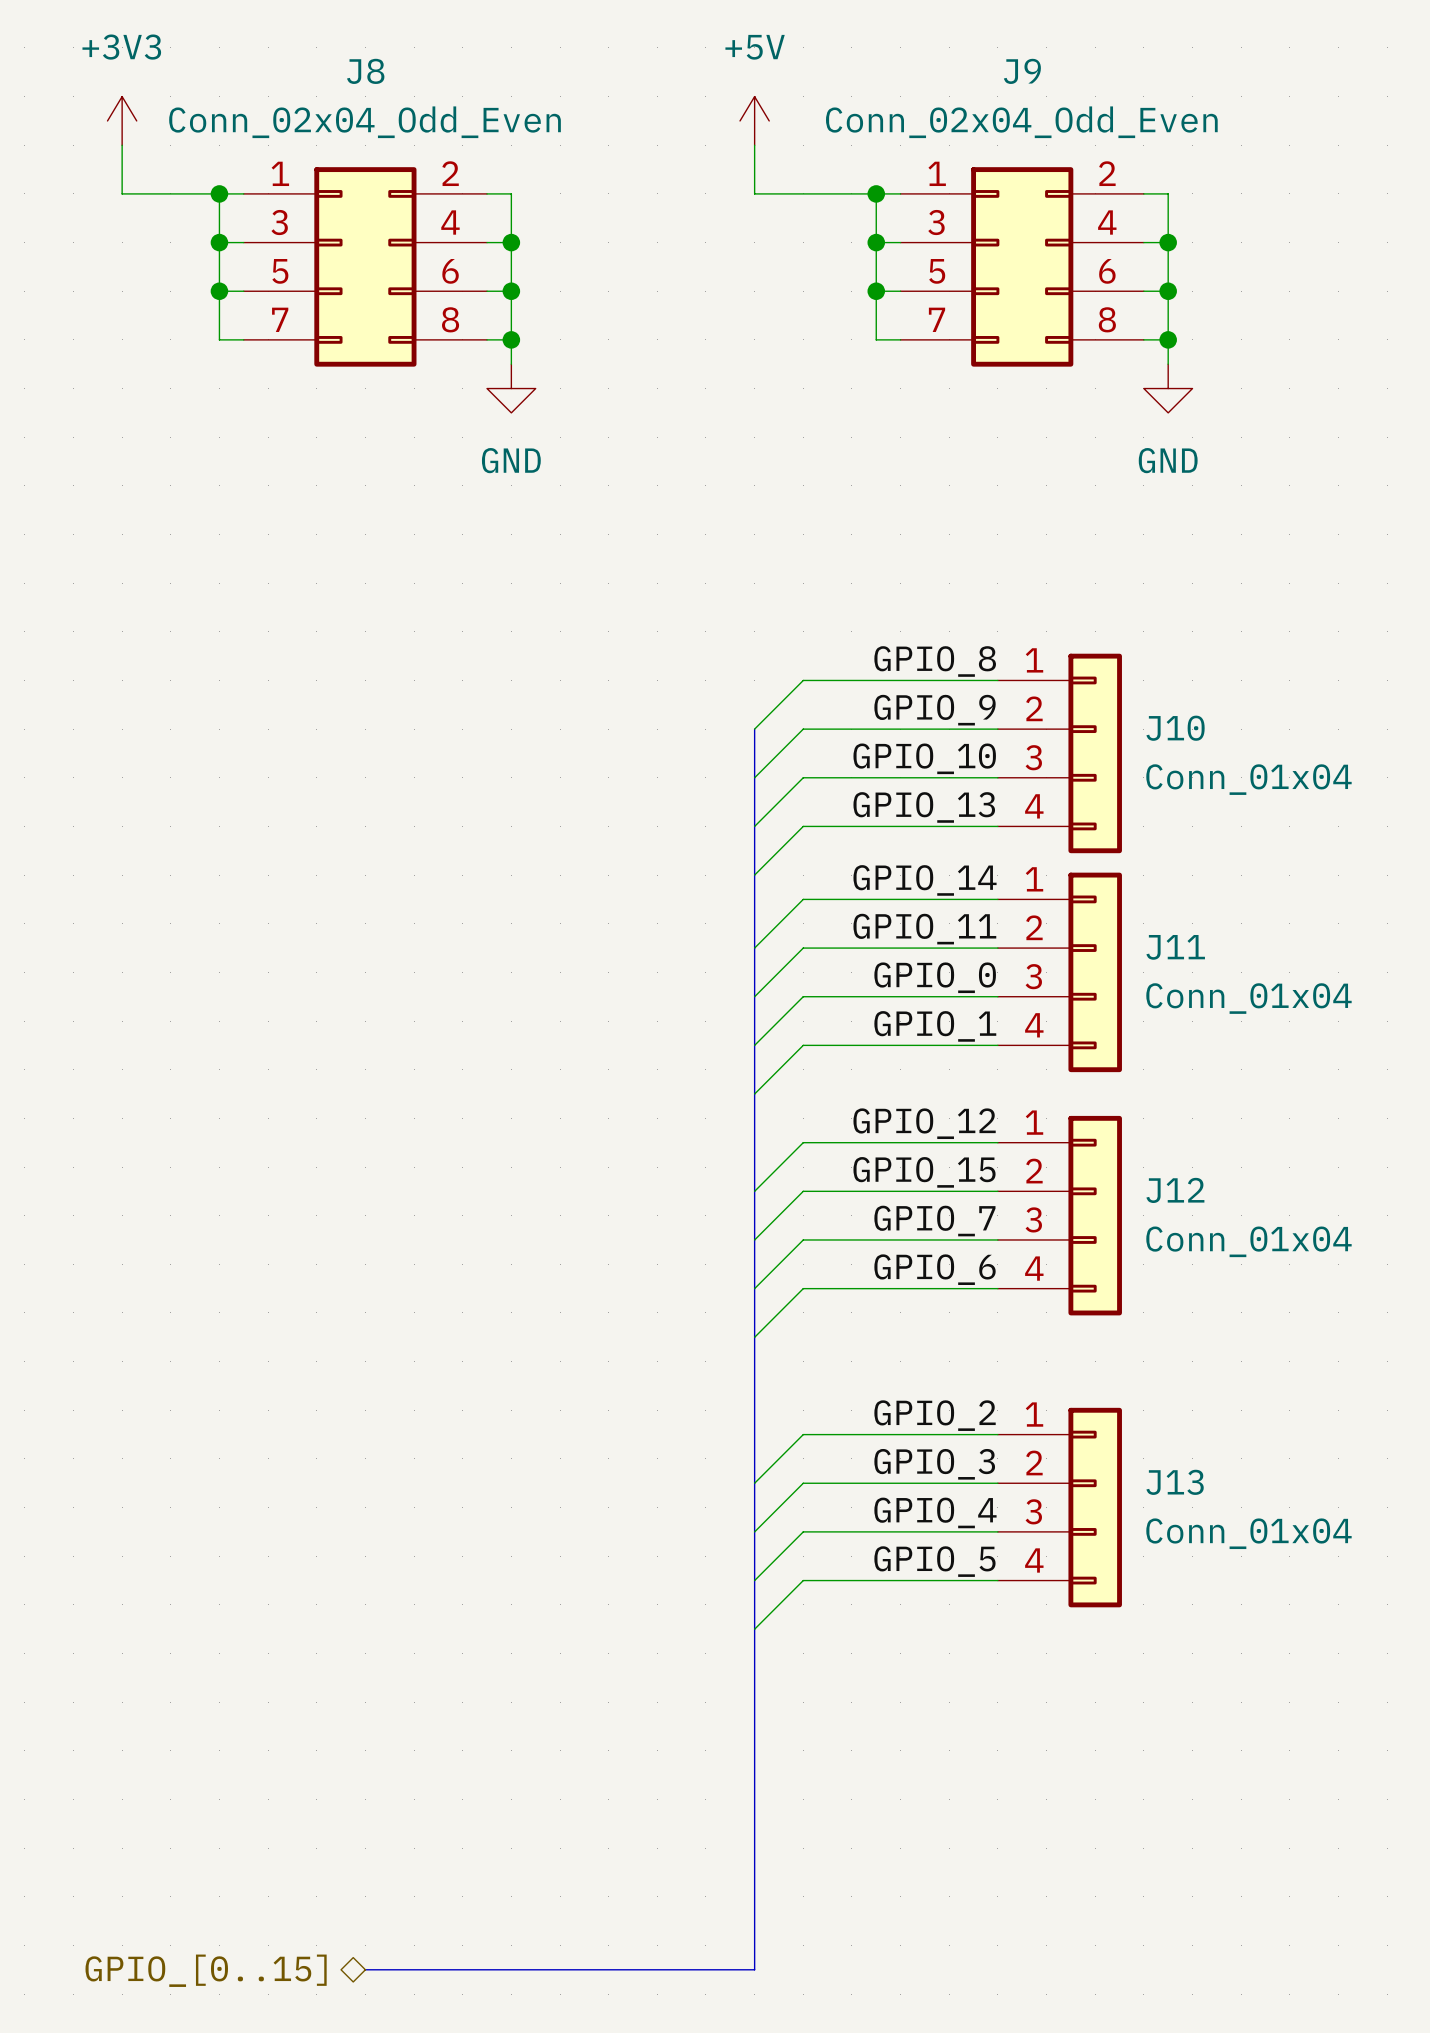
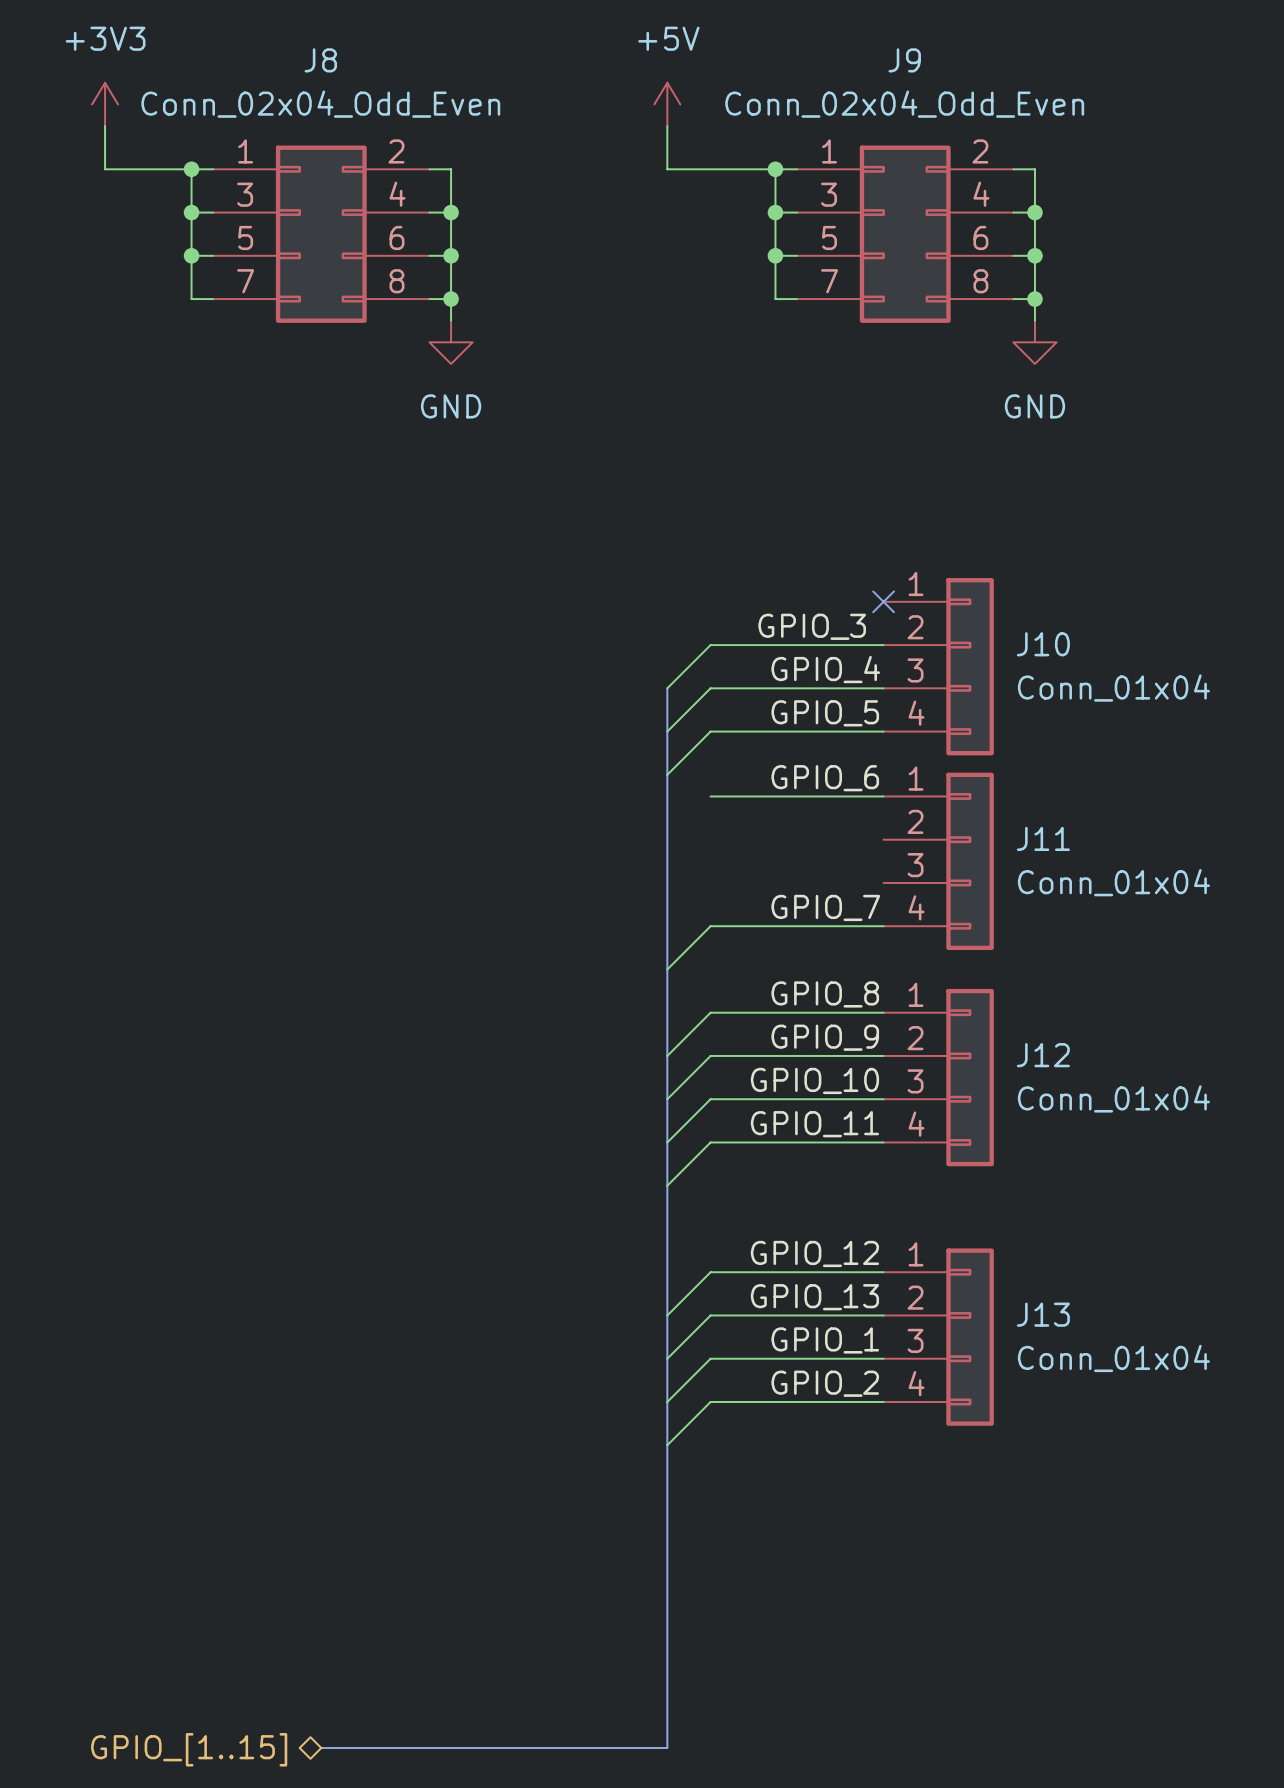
label: GPIO_8 (935, 661) -> none
wire: (997, 680) (803, 680) (754, 729) -> none
no-connect mark: none -> (883, 601)
label: none -> GPIO_3 (812, 626)
label: GPIO_9 (935, 710) -> none
bus: (754, 729) (754, 777) -> none
label: GPIO_10 (924, 758) -> GPIO_4 (825, 669)
label: GPIO_13 (924, 807) -> GPIO_5 (825, 713)
label: GPIO_14 (925, 880) -> GPIO_6 (825, 778)
wire: (803, 899) (754, 948) -> none
label: GPIO_11 (924, 929) -> none
wire: (997, 948) (803, 948) (754, 996) -> none
label: GPIO_0 (935, 977) -> none
wire: (997, 996) (803, 996) (754, 1045) -> none
label: GPIO_1 (935, 1026) -> GPIO_7 (825, 907)
label: GPIO_12 (924, 1123) -> GPIO_8 (825, 994)
label: GPIO_15 (924, 1172) -> GPIO_9 (825, 1037)
label: GPIO_7 (934, 1221) -> GPIO_10 (814, 1080)
label: GPIO_6 (935, 1269) -> GPIO_11 (814, 1124)
label: GPIO_2 (935, 1415) -> GPIO_12 (814, 1253)
label: GPIO_3 (934, 1464) -> GPIO_13 (814, 1297)
label: GPIO_4 (935, 1512) -> GPIO_1 (825, 1340)
label: GPIO_5 (934, 1561) -> GPIO_2 (825, 1383)
hierarchical label: GPIO_[0..15] (206, 1970) -> GPIO_[1..15] (189, 1749)

